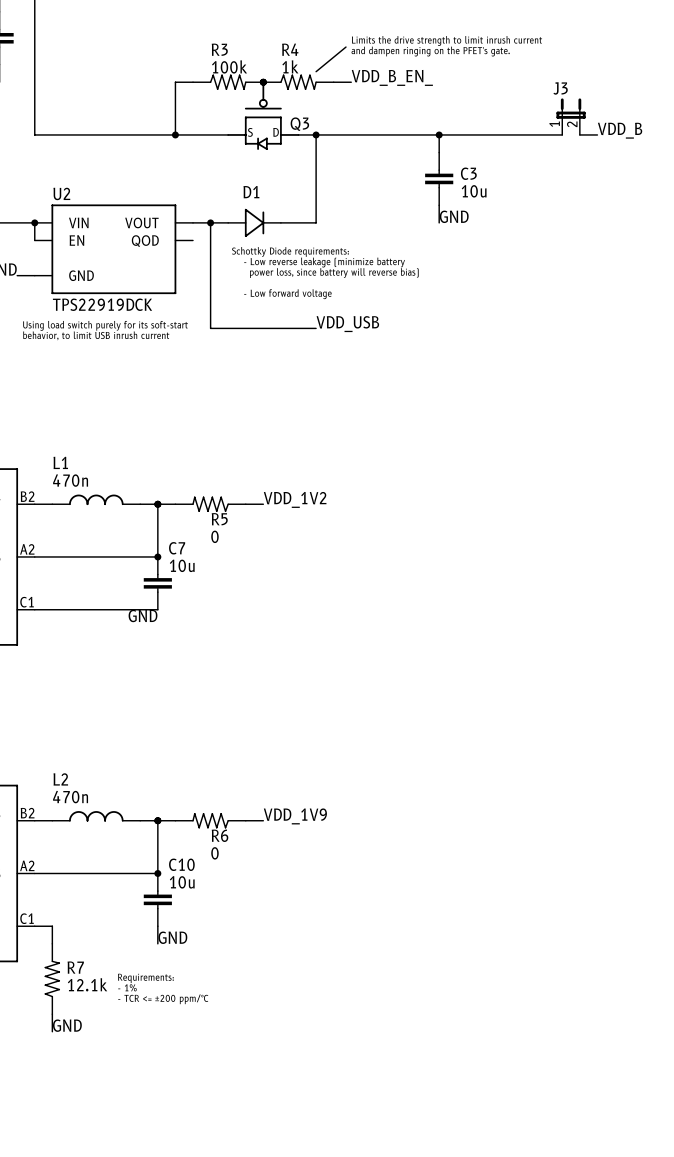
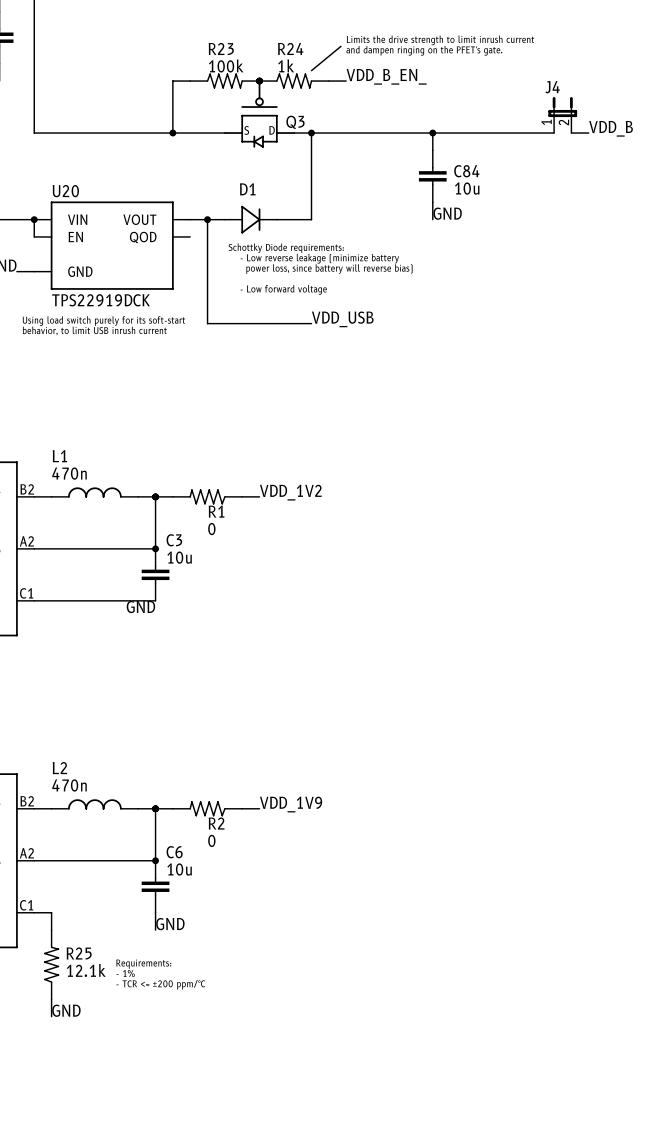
R3 name: R3 (219, 49) -> R23 (221, 48)
R4 name: R4 (290, 49) -> R24 (290, 48)
J3 name: J3 (560, 88) -> J4 (552, 87)
C3 name: C3 (468, 173) -> C84 (466, 171)
U2 name: U2 (61, 193) -> U20 (65, 191)
R5 name: R5 (219, 519) -> R1 (216, 511)
C7 name: C7 (177, 548) -> C3 (174, 540)
R6 name: R6 (220, 835) -> R2 (216, 823)
C10 name: C10 (181, 864) -> C6 (174, 852)
R7 name: R7 (75, 967) -> R25 (79, 953)

